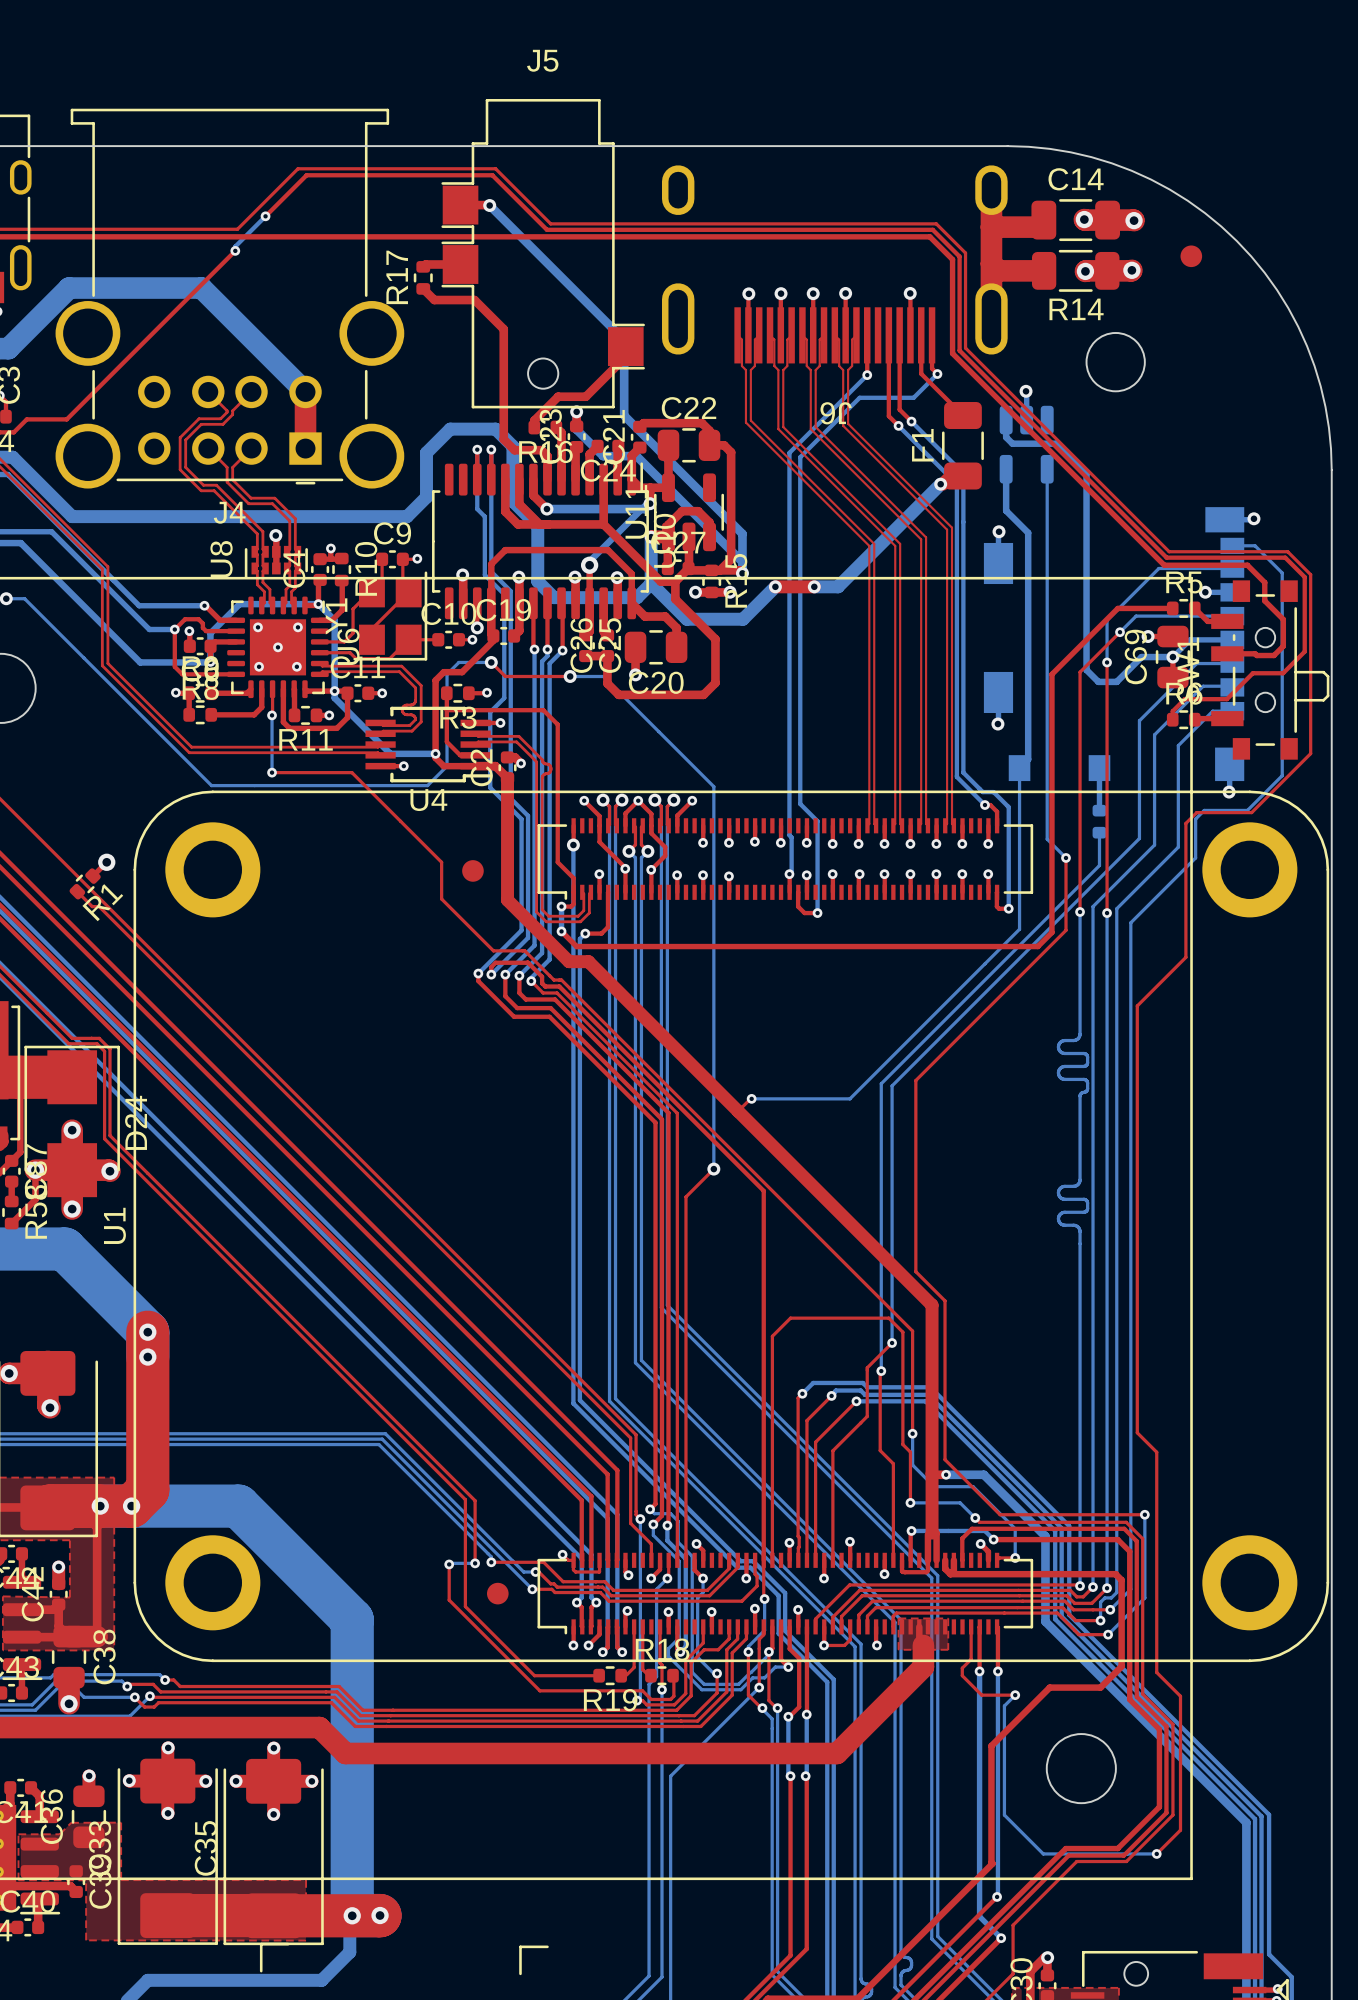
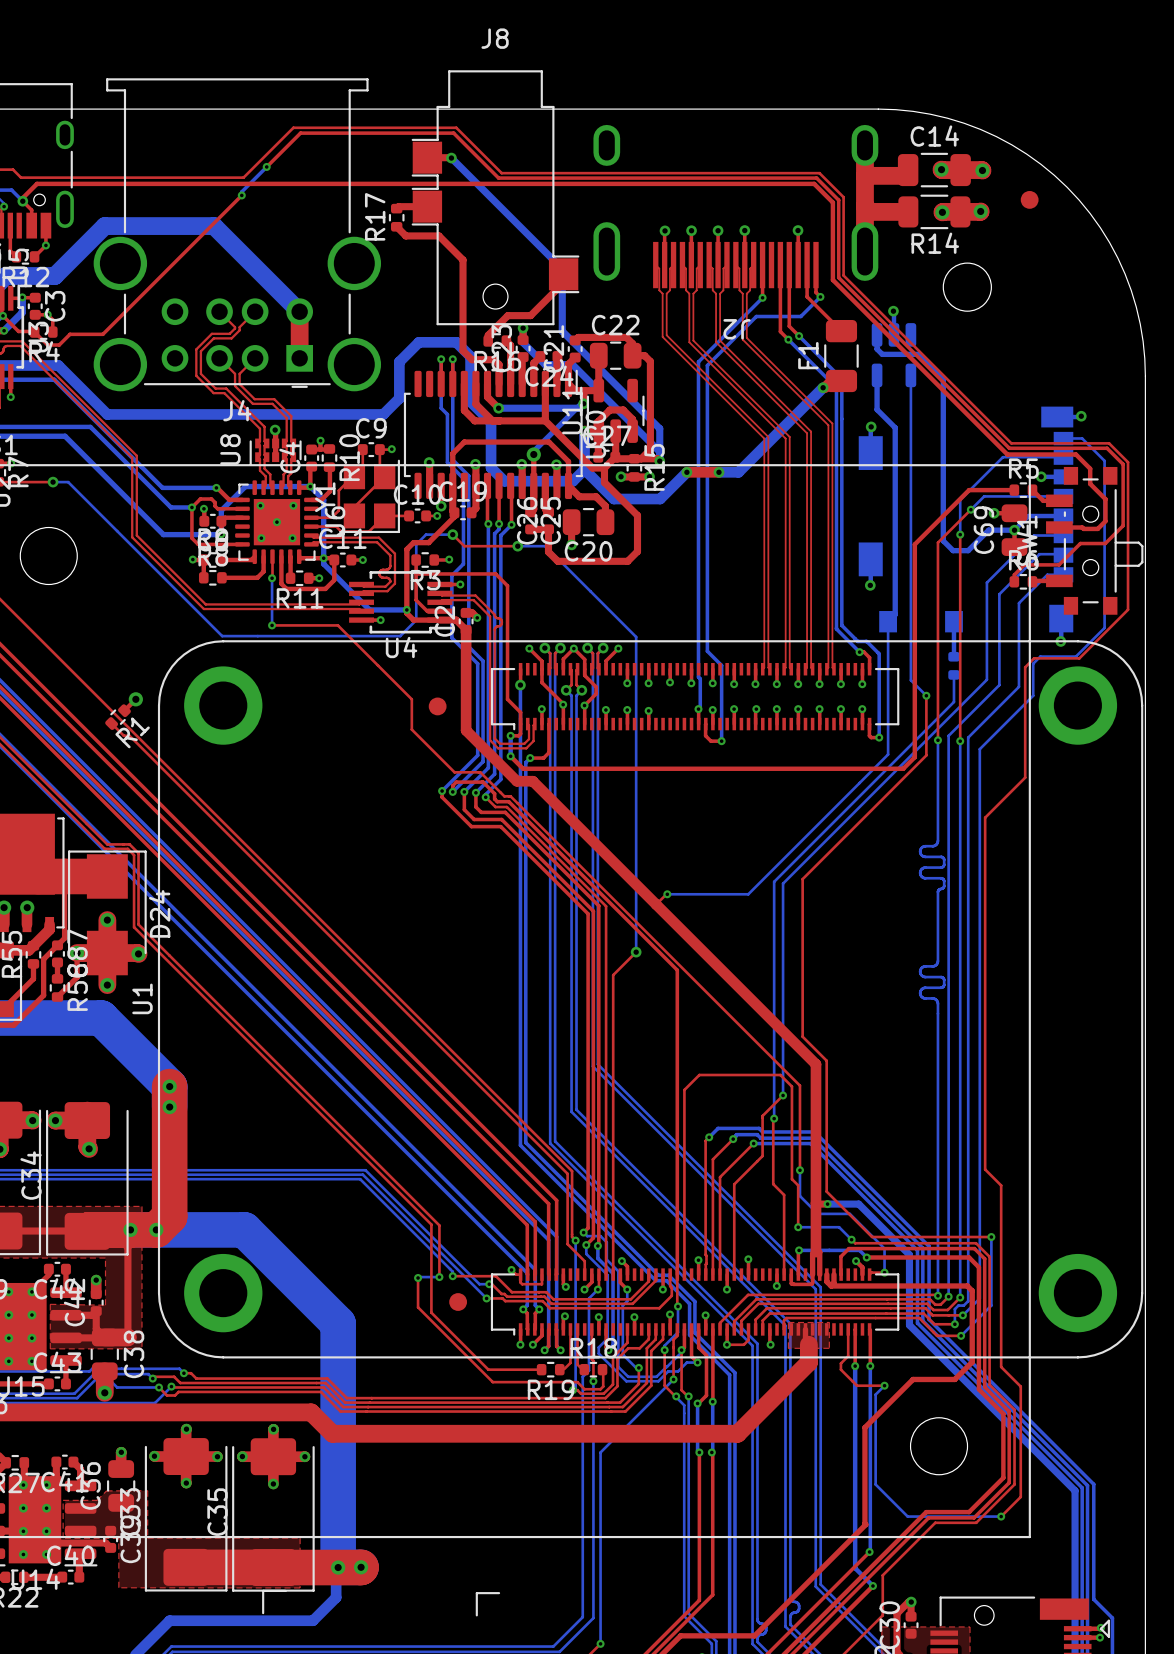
J5 name: J5 (542, 60) -> J8 (495, 38)
J6 name: J6 (836, 413) -> J2 (737, 329)

